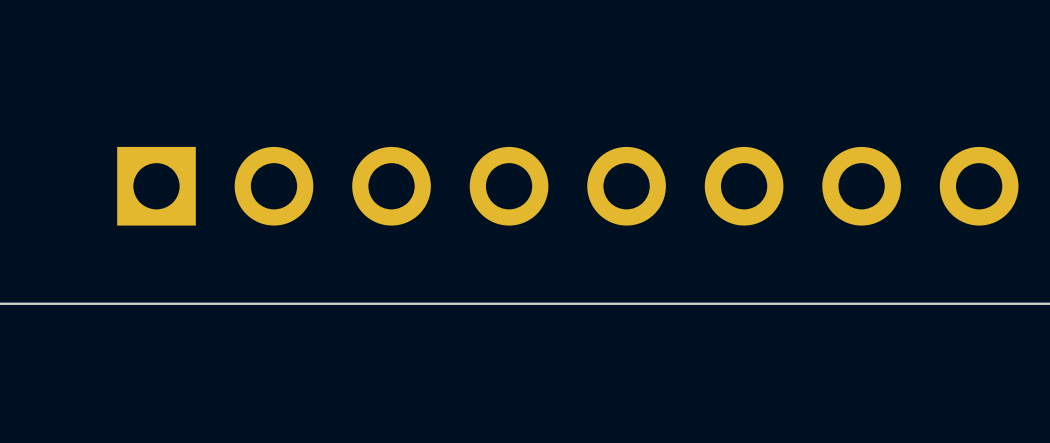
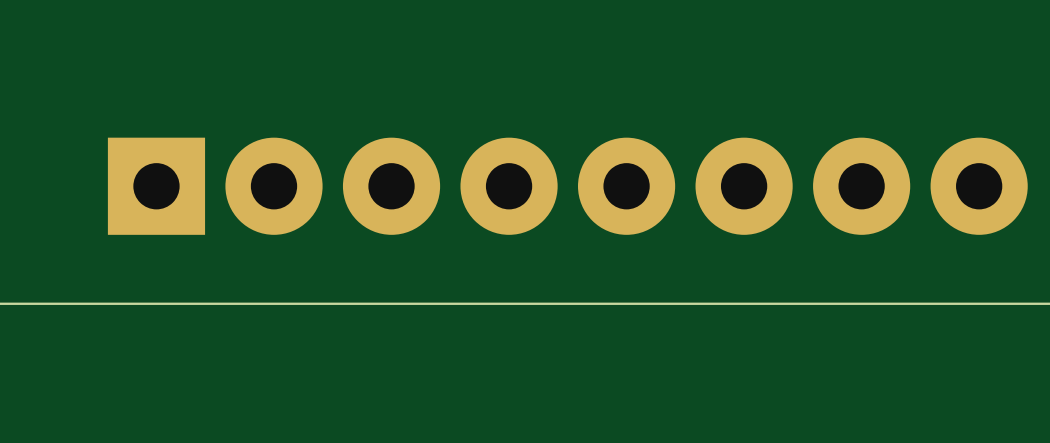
part footprint: [117, 146, 1019, 226] -> [107, 137, 1028, 235]

